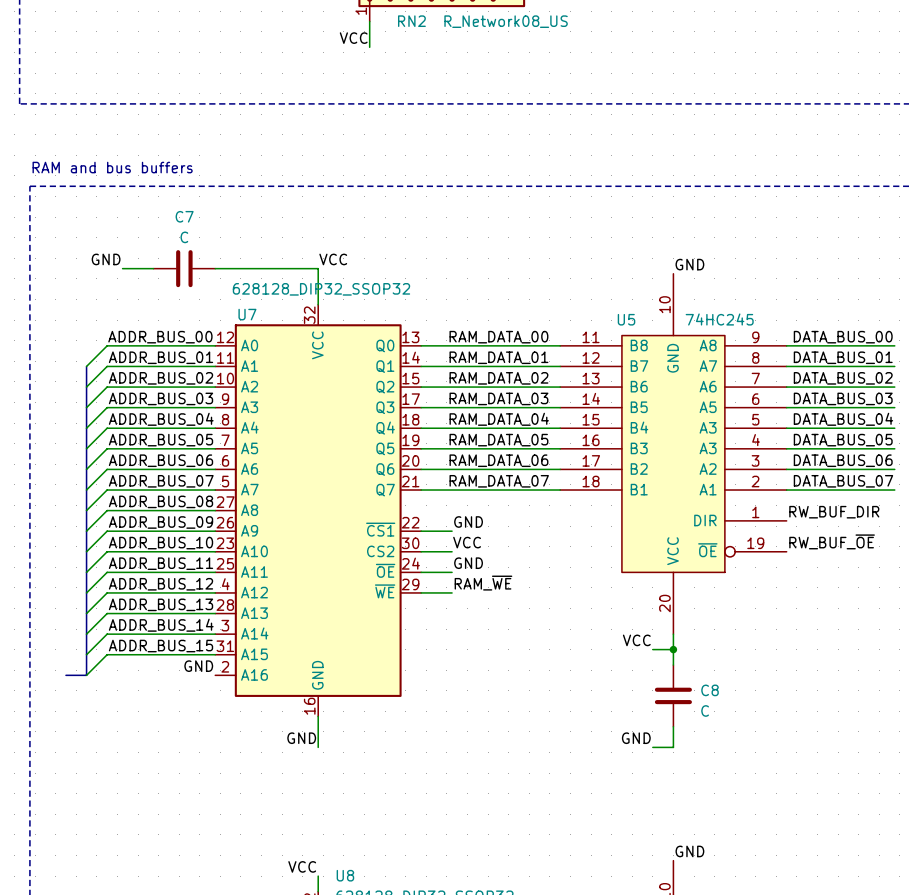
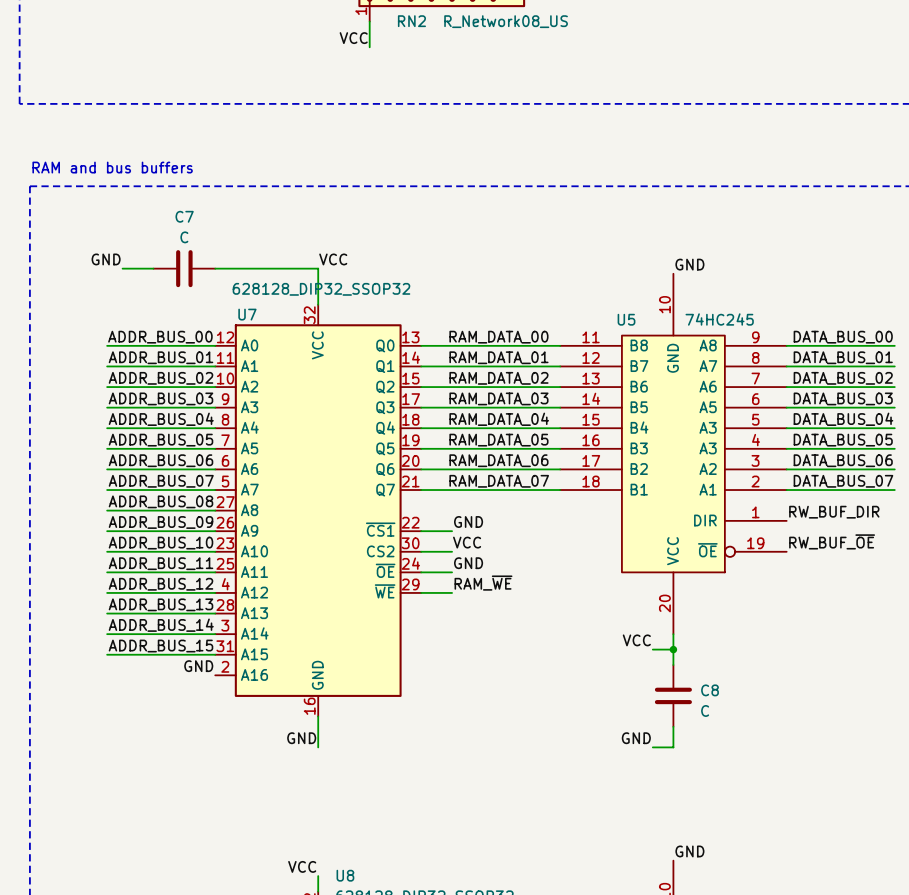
wire: (107, 345) (86, 366) -> none
bus: (86, 366) (86, 675) (65, 675) -> none
wire: (107, 366) (86, 387) -> none
wire: (107, 387) (86, 407) -> none
wire: (107, 407) (86, 428) -> none
wire: (107, 428) (86, 448) -> none
wire: (107, 448) (86, 469) -> none
wire: (107, 469) (86, 490) -> none
wire: (107, 490) (86, 510) -> none
wire: (107, 510) (86, 531) -> none
wire: (107, 531) (86, 551) -> none
wire: (107, 551) (86, 572) -> none
wire: (107, 572) (86, 592) -> none
wire: (107, 592) (86, 613) -> none
wire: (107, 613) (86, 634) -> none
wire: (107, 634) (86, 654) -> none
wire: (107, 654) (86, 675) -> none

